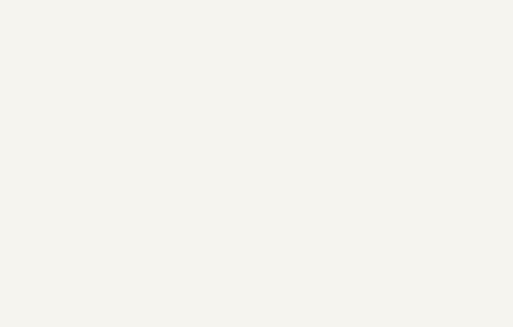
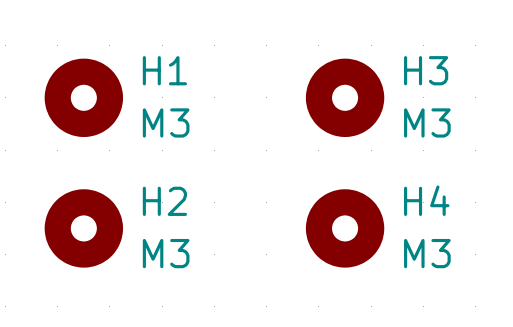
H1: none -> M3 (83, 97)
H3: none -> M3 (345, 97)
H2: none -> M3 (83, 228)
H4: none -> M3 (345, 228)

